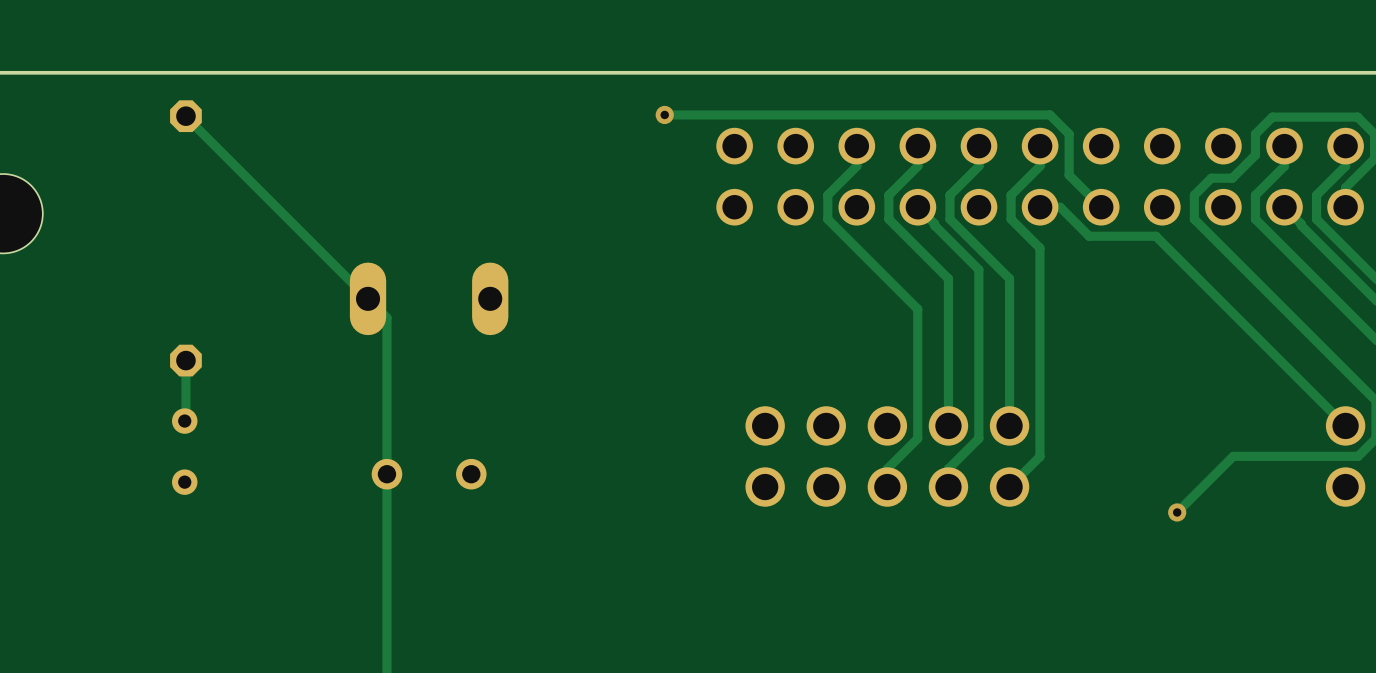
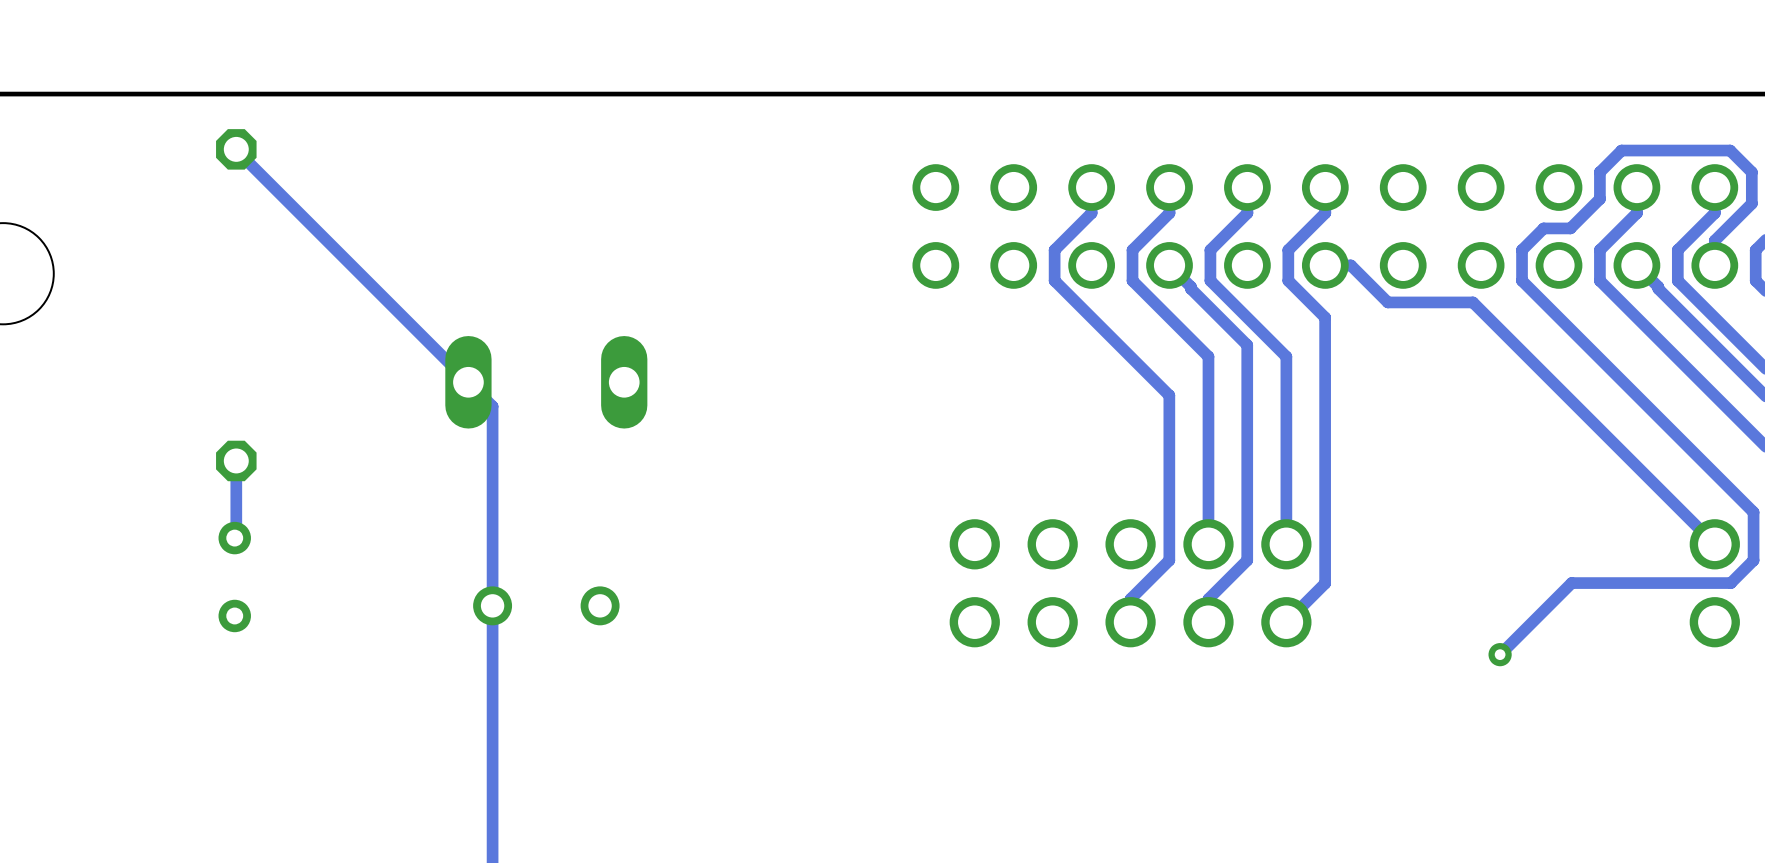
track: (664, 114) (1049, 114) (1069, 134) (1069, 175) (1101, 207) -> none
via: (664, 114) -> none

